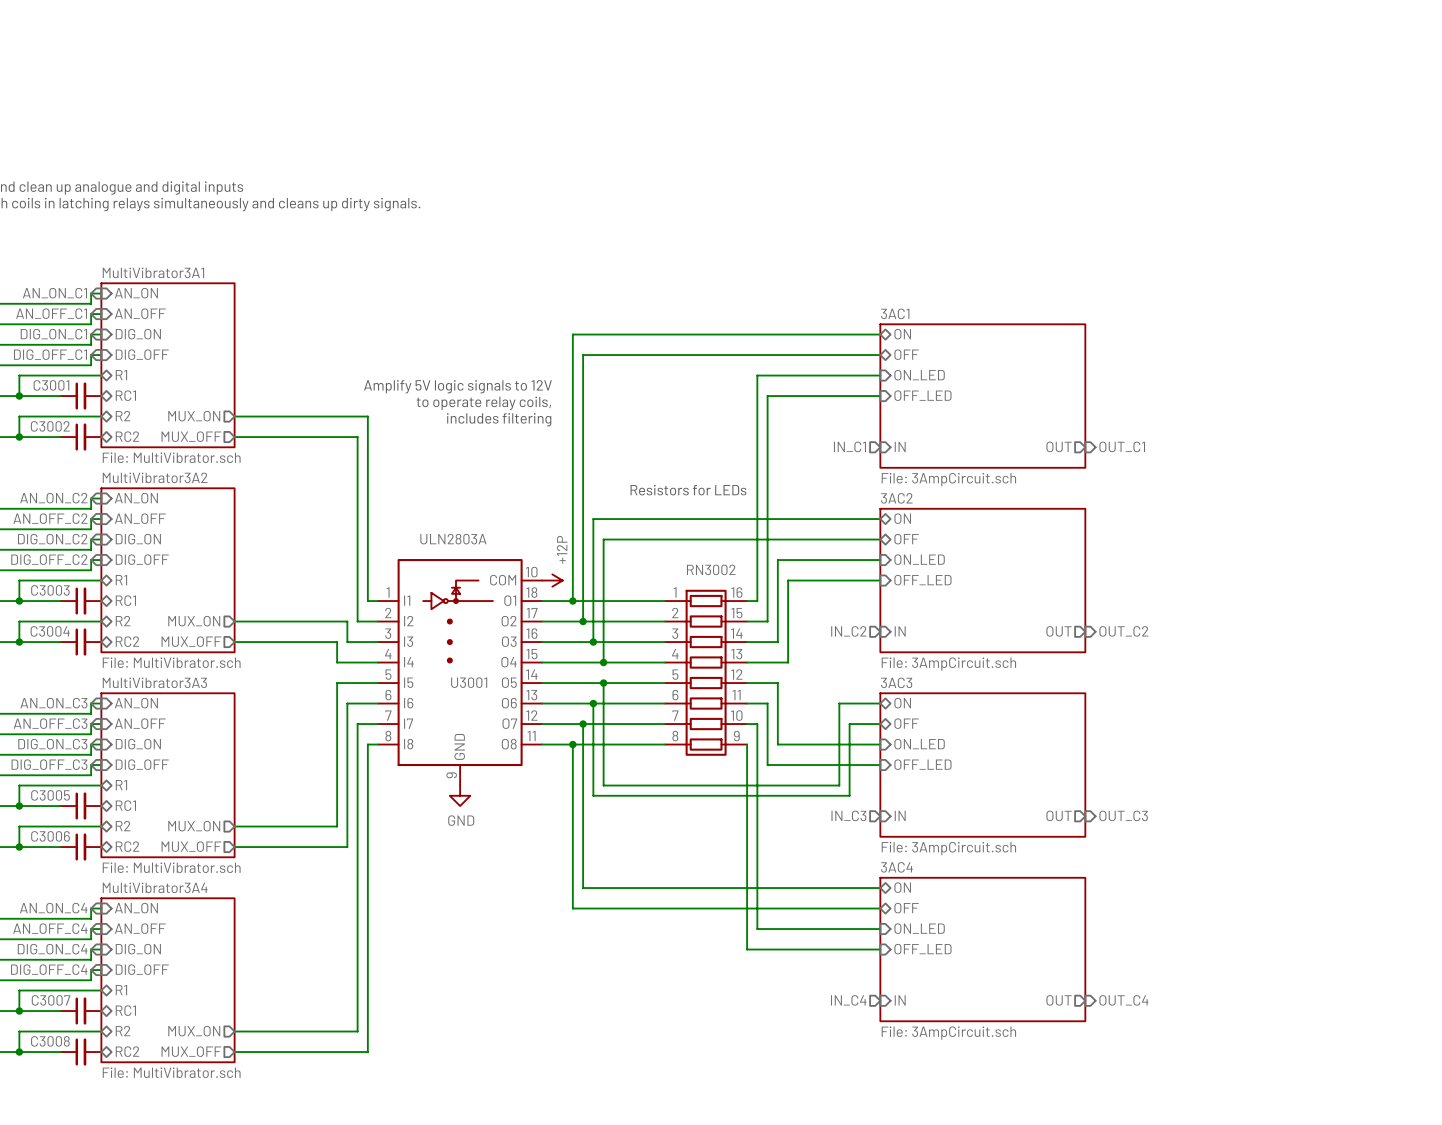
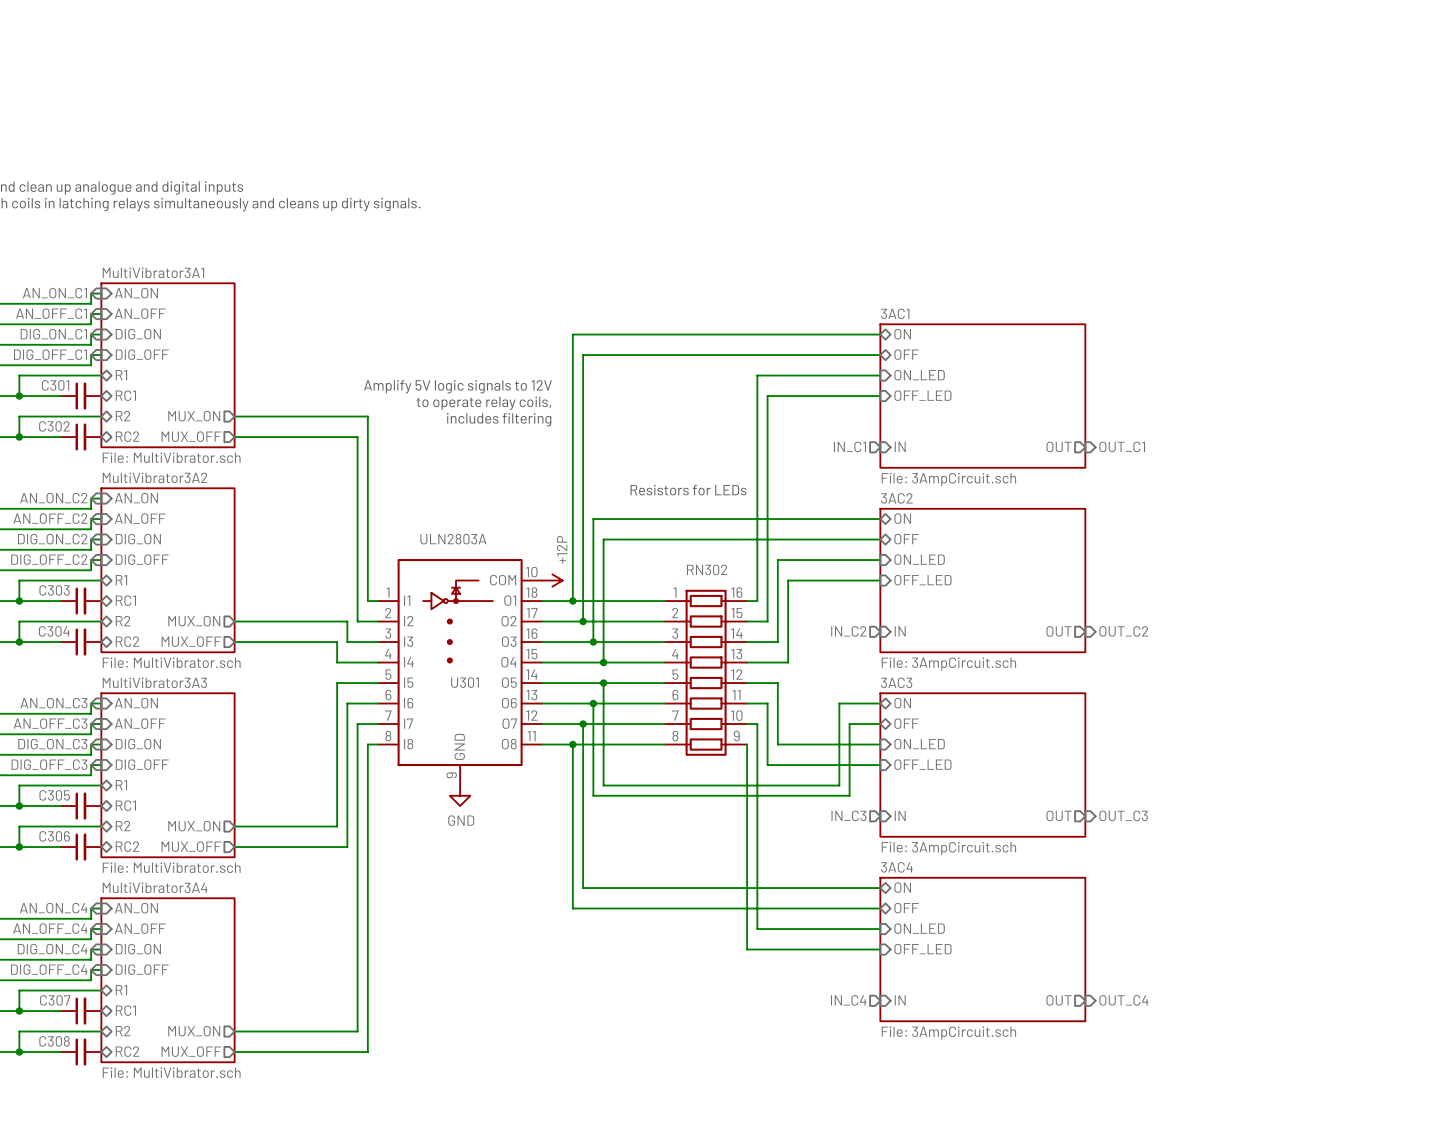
C3001 name: C3001 (51, 385) -> C301 (55, 385)
C3002 name: C3002 (50, 426) -> C302 (54, 426)
RN3002 name: RN3002 (711, 569) -> RN302 (707, 569)
C3003 name: C3003 (50, 590) -> C303 (54, 590)
C3004 name: C3004 (50, 631) -> C304 (54, 631)
U3001 name: U3001 (469, 682) -> U301 (465, 682)
C3005 name: C3005 (50, 795) -> C305 (54, 795)
C3006 name: C3006 (50, 836) -> C306 (54, 836)
C3007 name: C3007 (51, 1000) -> C307 (55, 1000)
C3008 name: C3008 (50, 1041) -> C308 (54, 1041)

